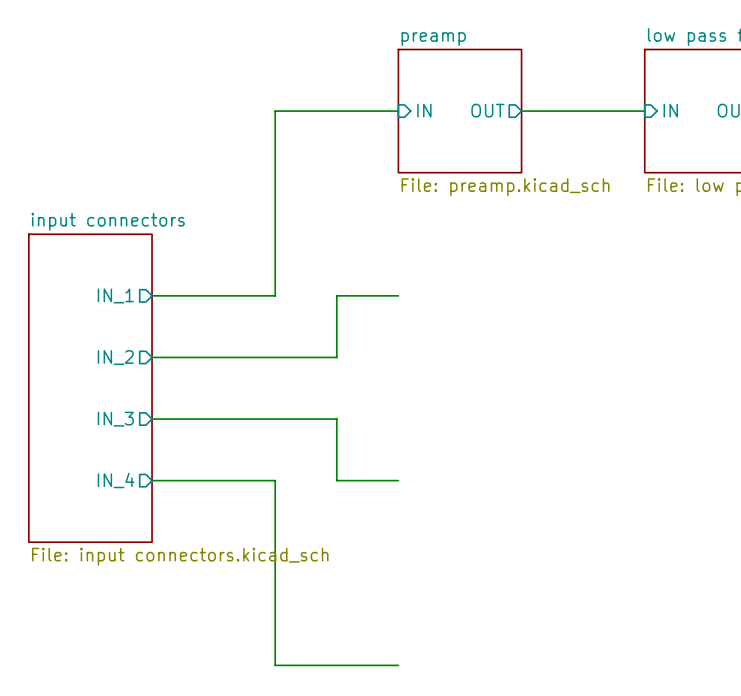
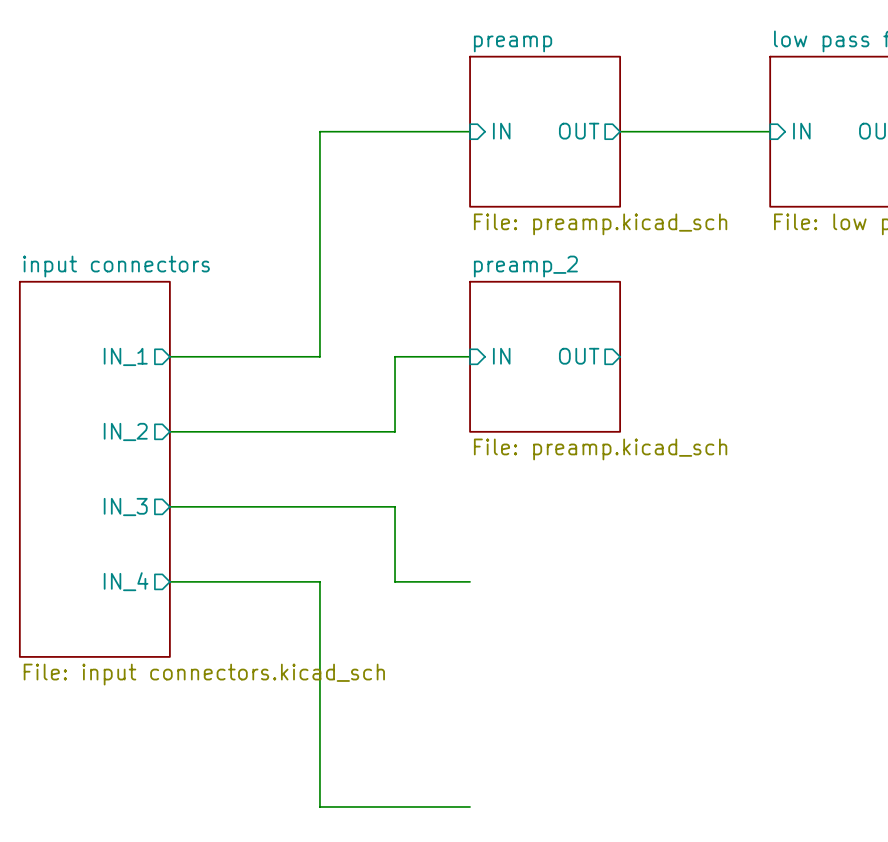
sheet pin: none -> IN (501, 356)
sheet preamp_2: none -> File: preamp.kicad_sch (545, 356)
sheet pin: none -> OUT (579, 356)

